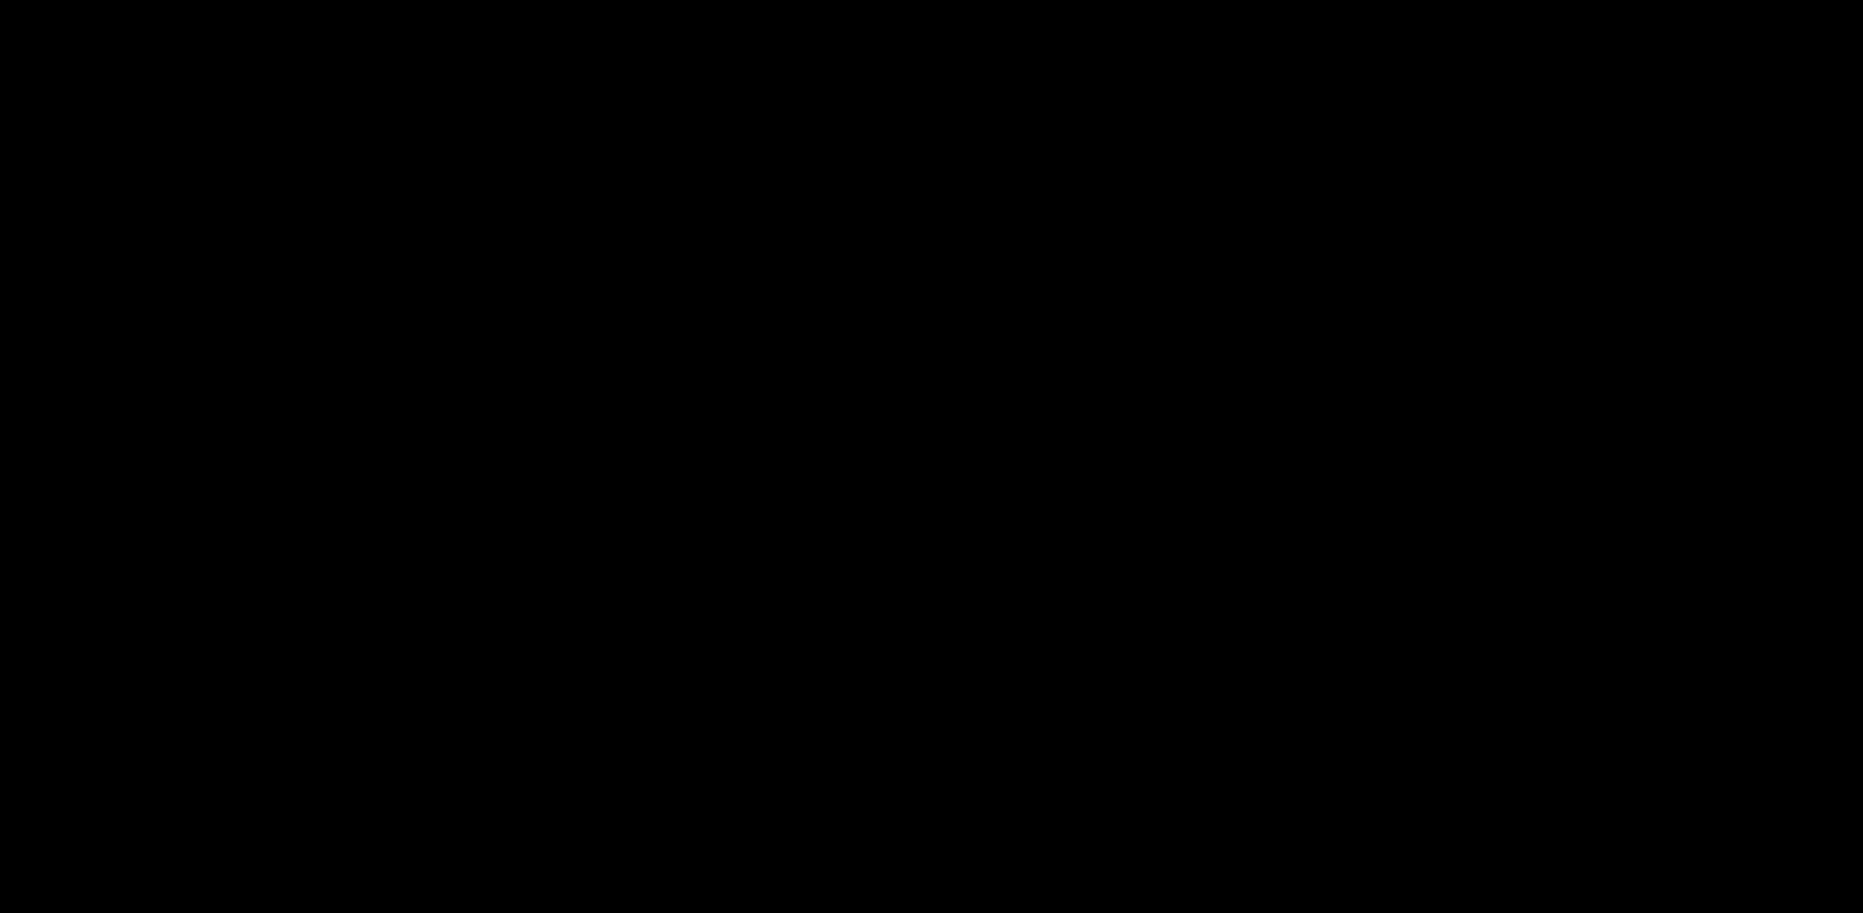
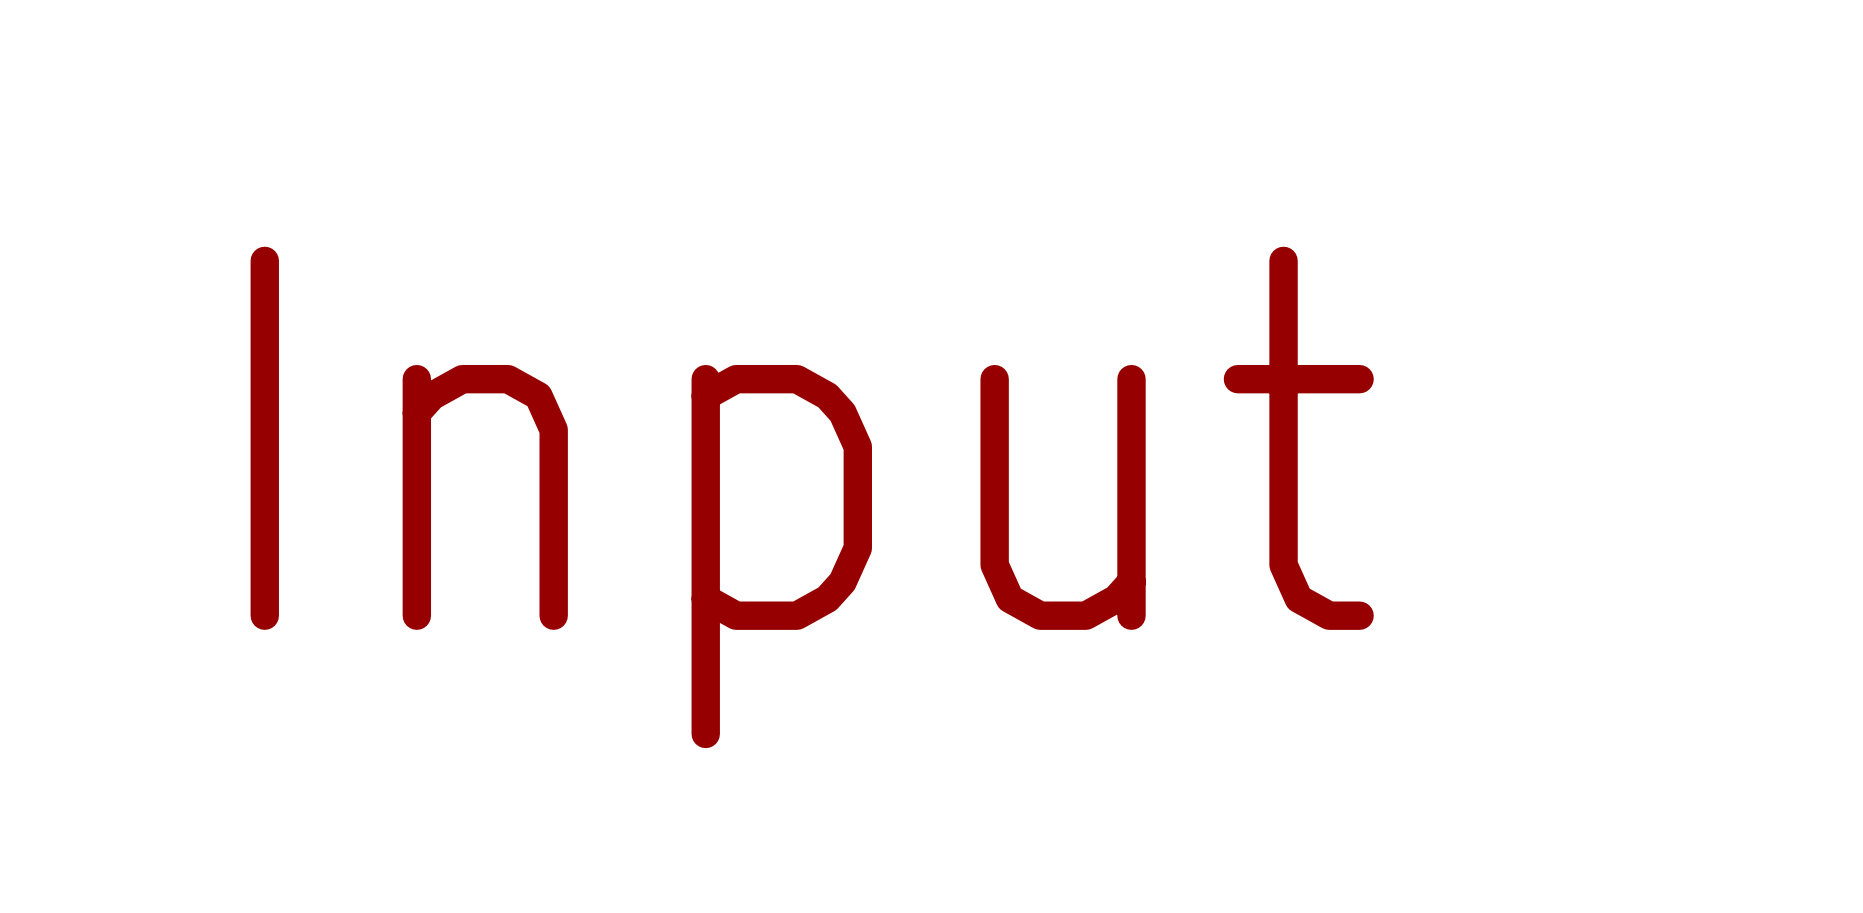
text: none -> Input (812, 497)

